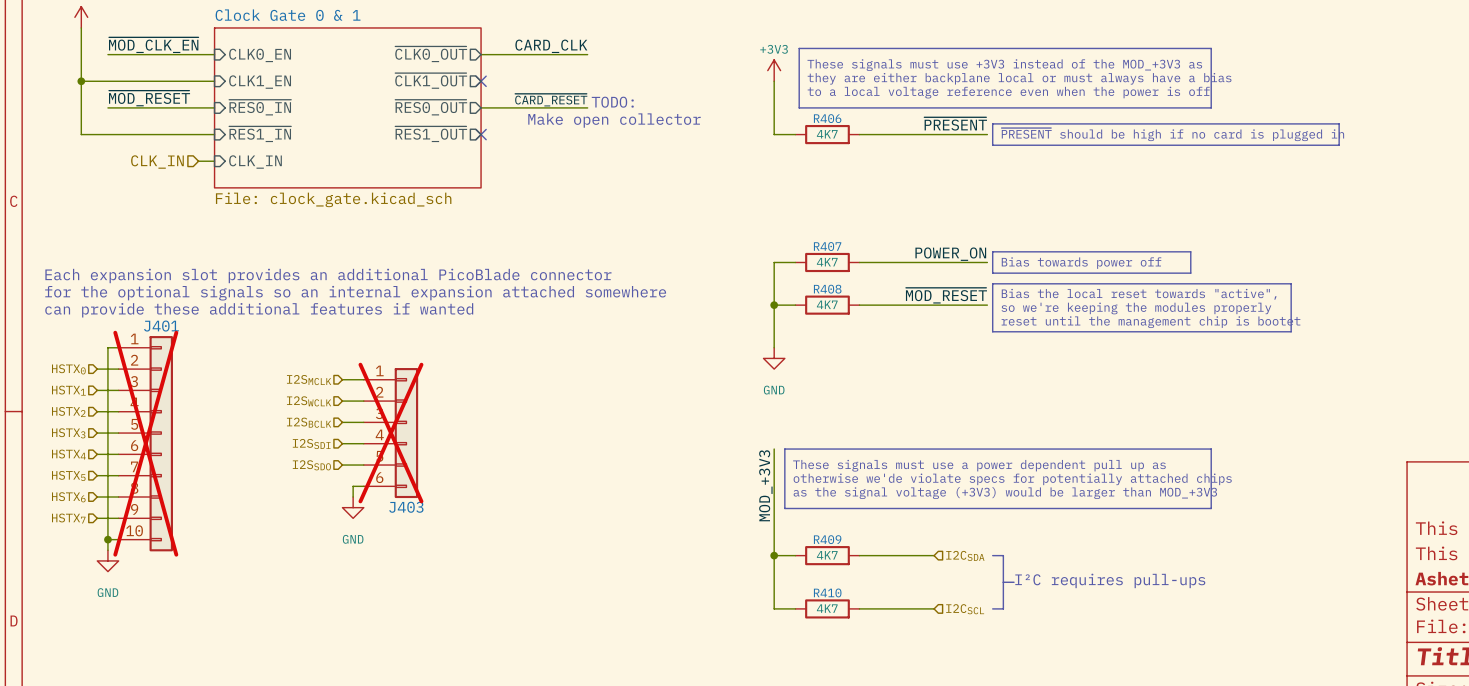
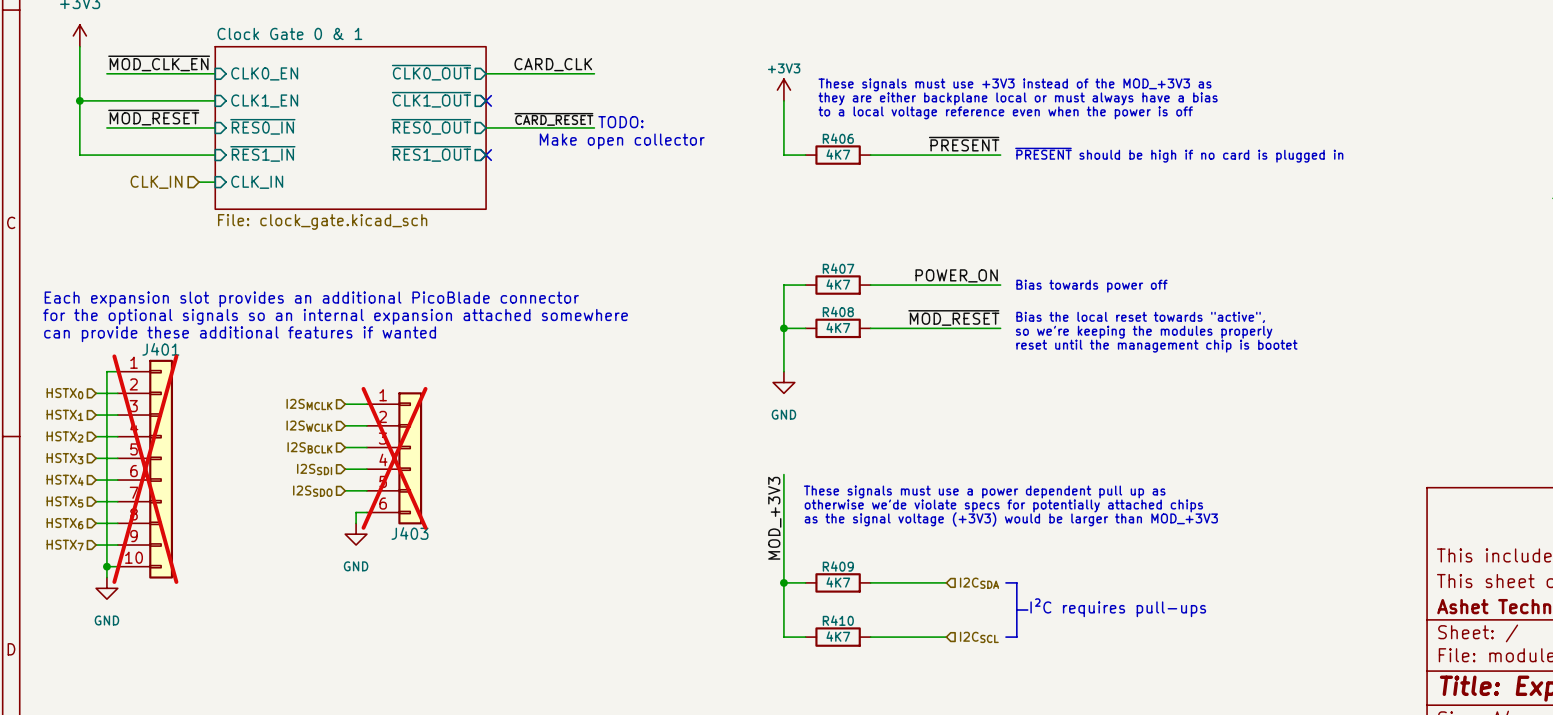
line: (799, 48) (1211, 48) (1211, 107) (799, 107) (799, 48) -> none
line: (992, 123) (992, 145) (1339, 145) (1339, 123) (992, 123) -> none
line: (992, 251) (1190, 251) (1190, 273) (992, 273) (992, 251) -> none
line: (992, 283) (992, 331) (1291, 331) (1291, 283) (992, 283) -> none
line: (784, 449) (1211, 449) (1211, 508) (784, 508) (784, 449) -> none

